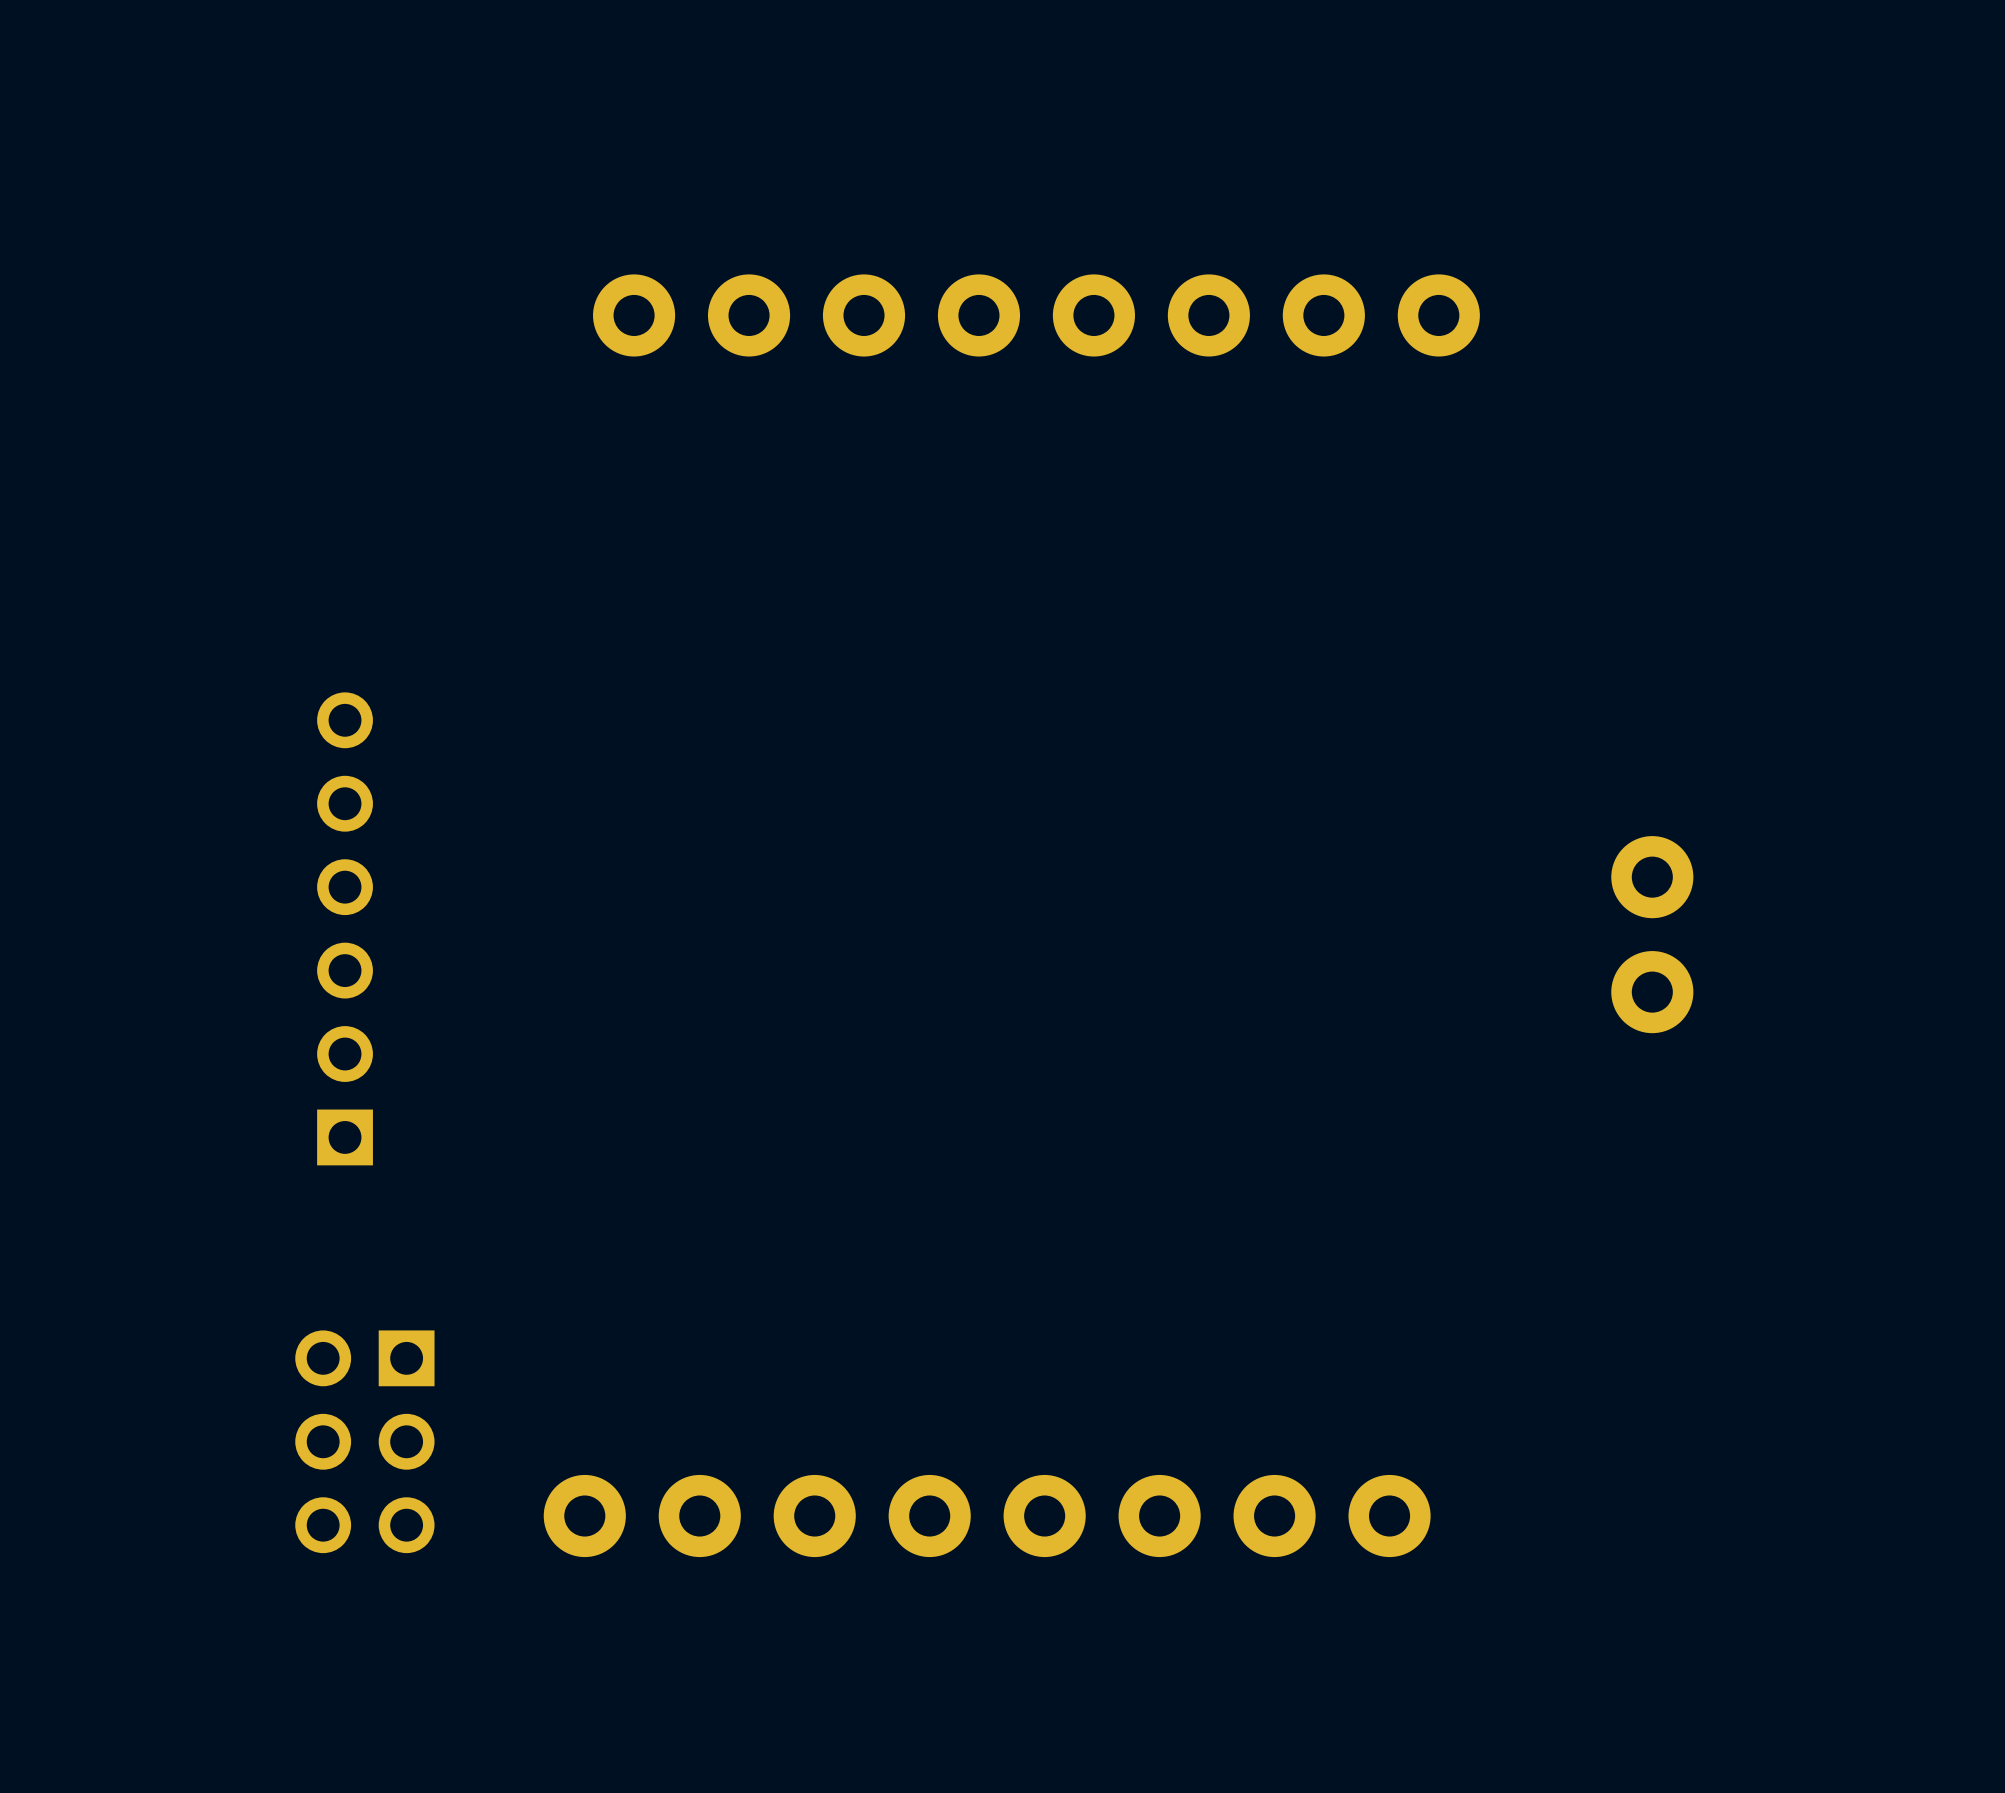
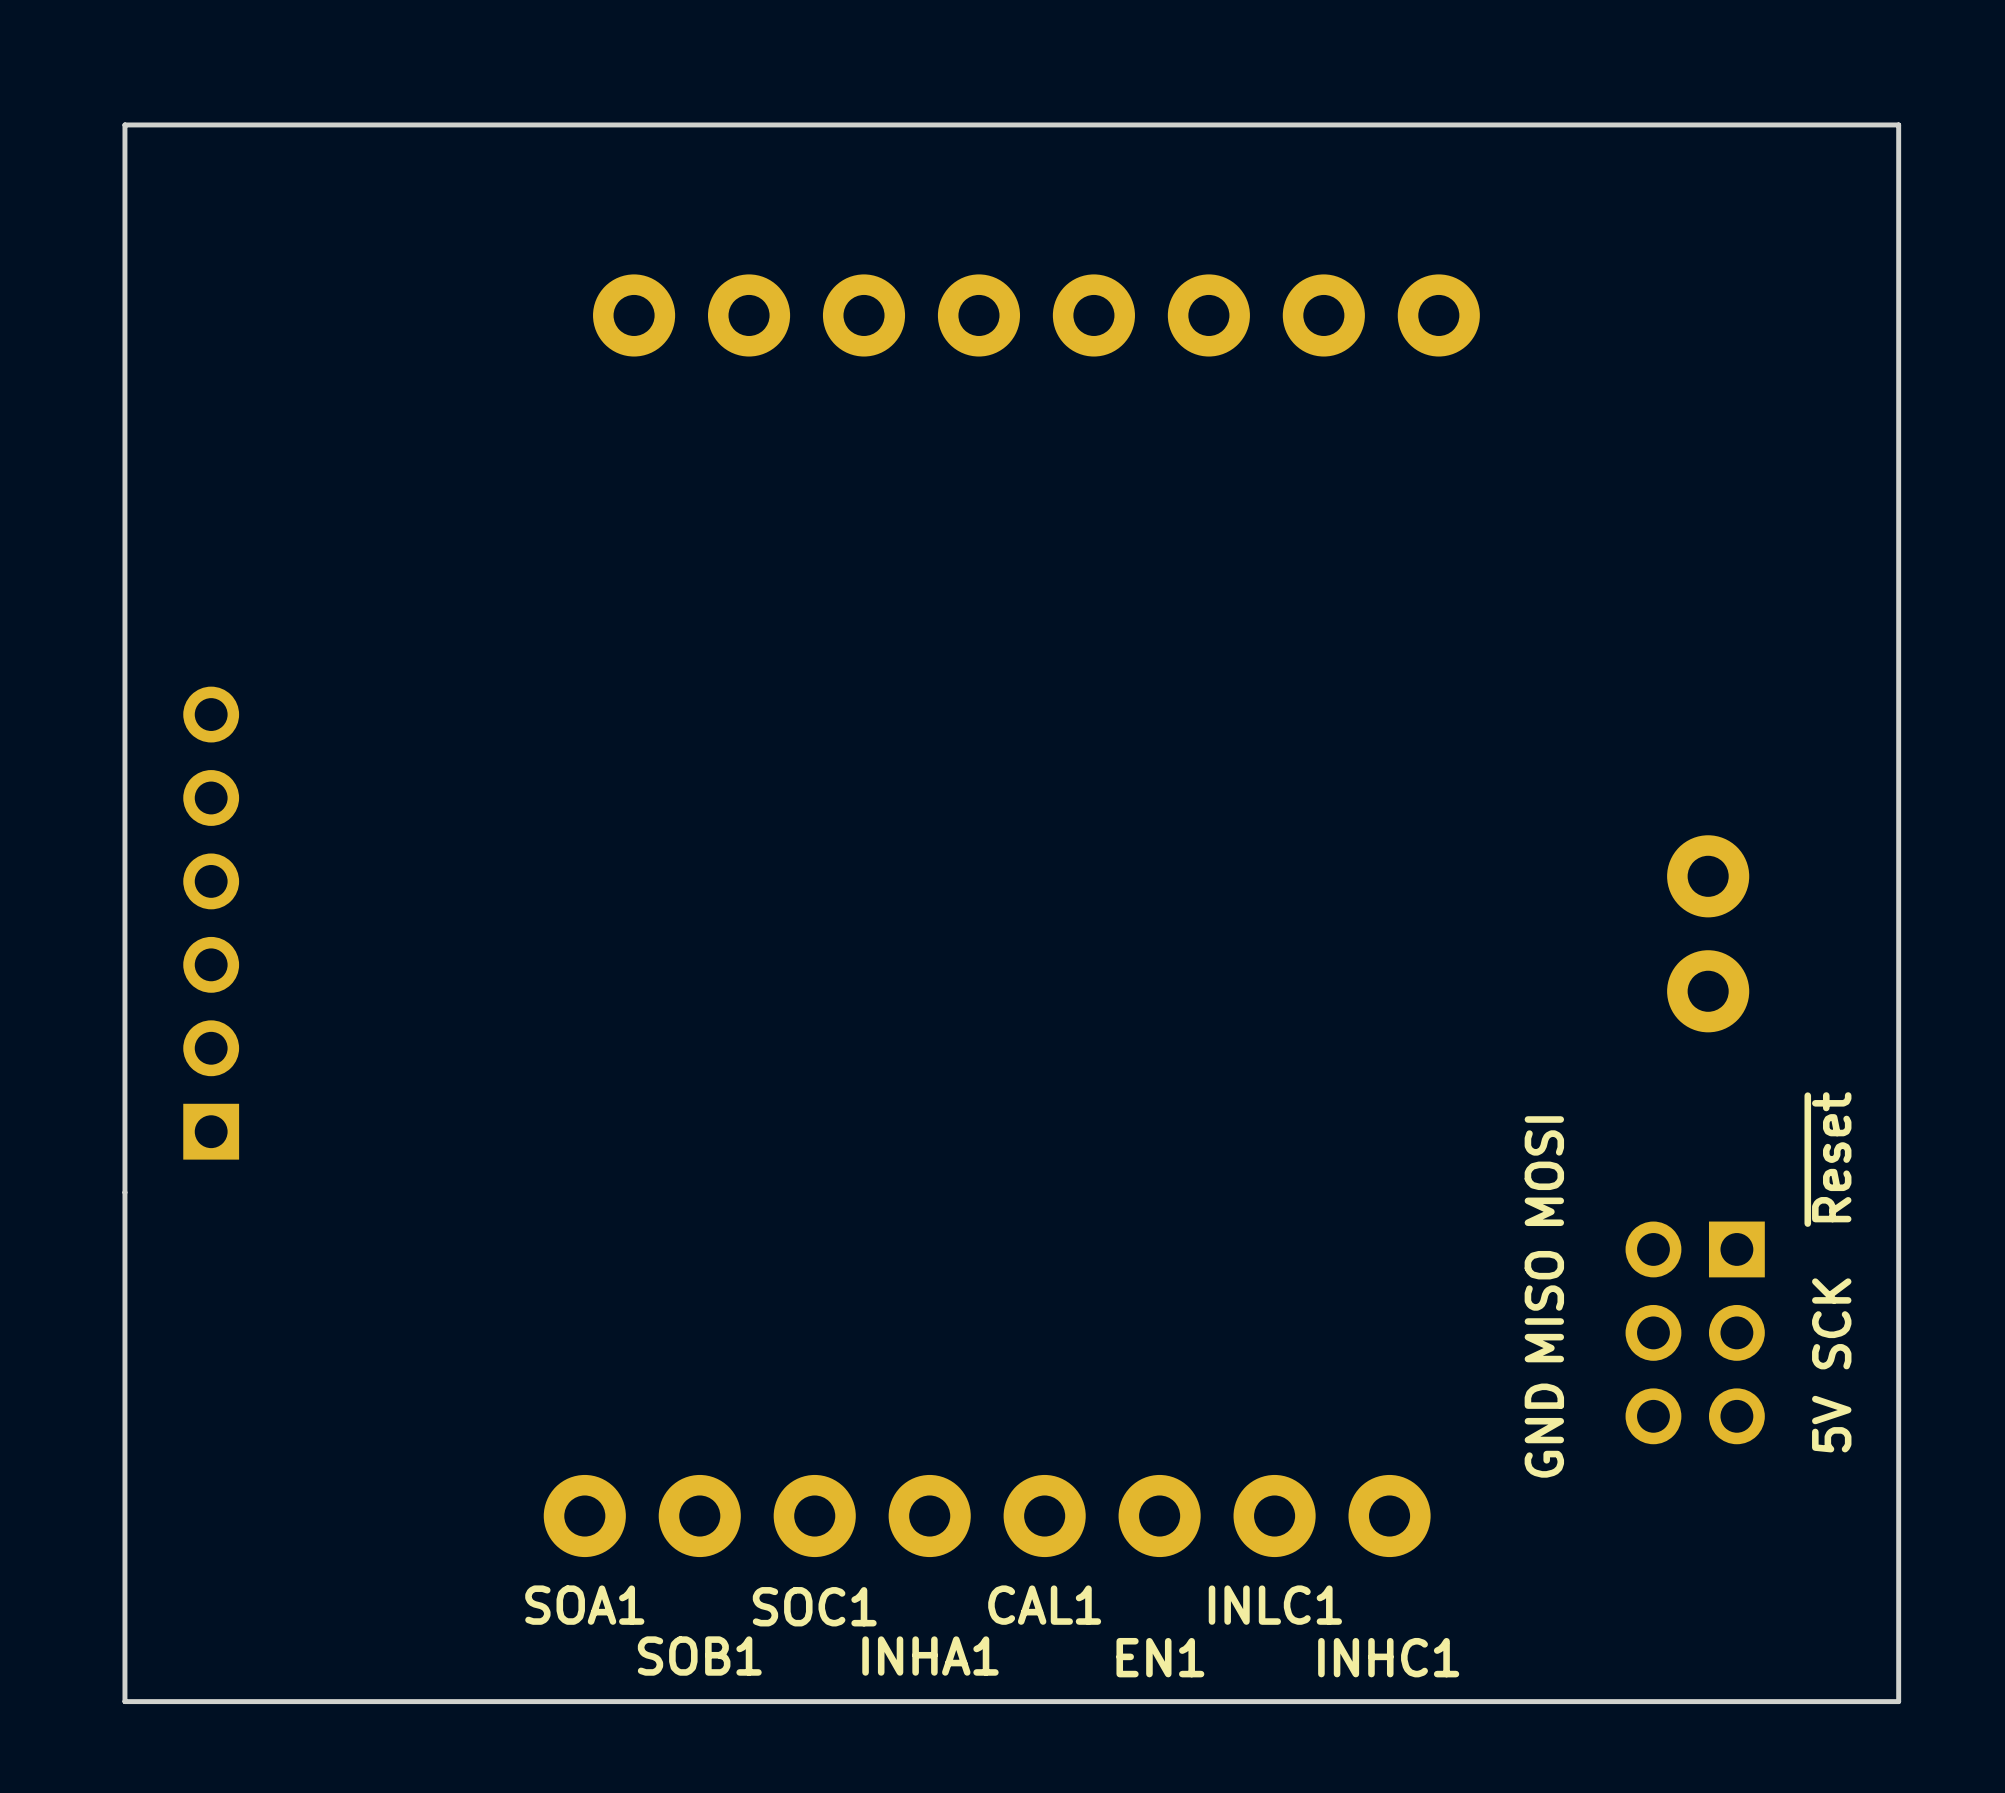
board edge: none -> (1898, 124) (1898, 1701) (124, 1701) (124, 124) (1898, 124)
part position: (345, 928) -> (211, 923)
part position: (1652, 934) -> (1708, 933)
text: none -> ~{Reset} (1827, 1159)
text: none -> MOSI (1544, 1171)
text: none -> MISO (1544, 1306)
text: none -> SCK (1831, 1323)
part: none -> (1695, 1332)
text: none -> 5V (1831, 1424)
text: none -> GND (1544, 1430)
part: (364, 1441) -> none
text: none -> SOA1 (584, 1605)
text: none -> CAL1 (1044, 1605)
text: none -> INLC1 (1275, 1605)
text: none -> SOC1 (814, 1606)
text: none -> SOB1 (699, 1656)
text: none -> INHA1 (930, 1656)
text: none -> EN1 (1160, 1657)
text: none -> INHC1 (1388, 1657)

